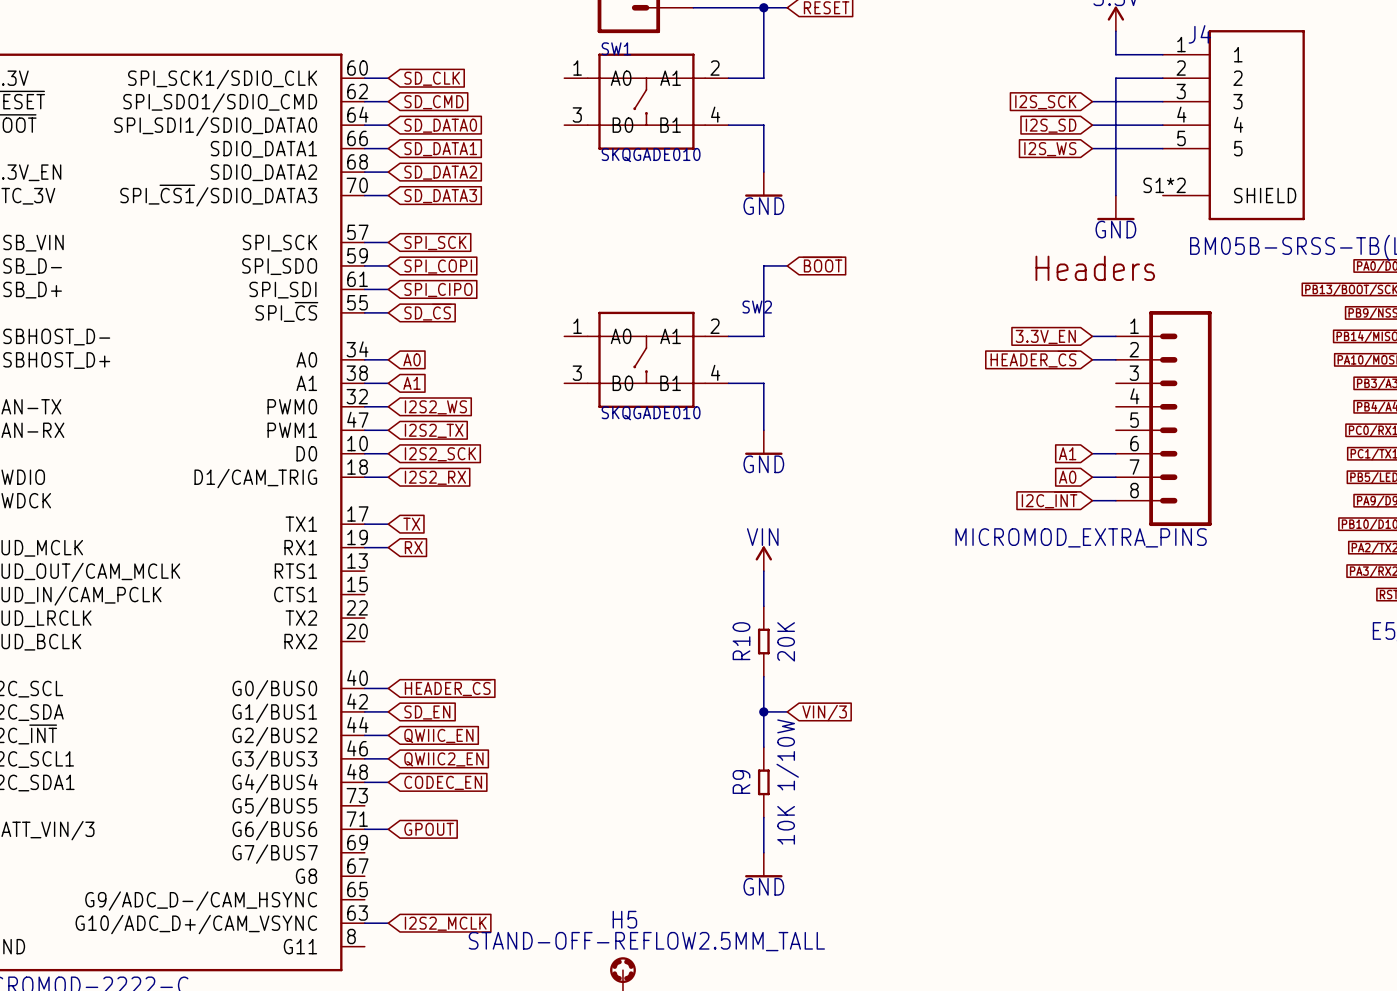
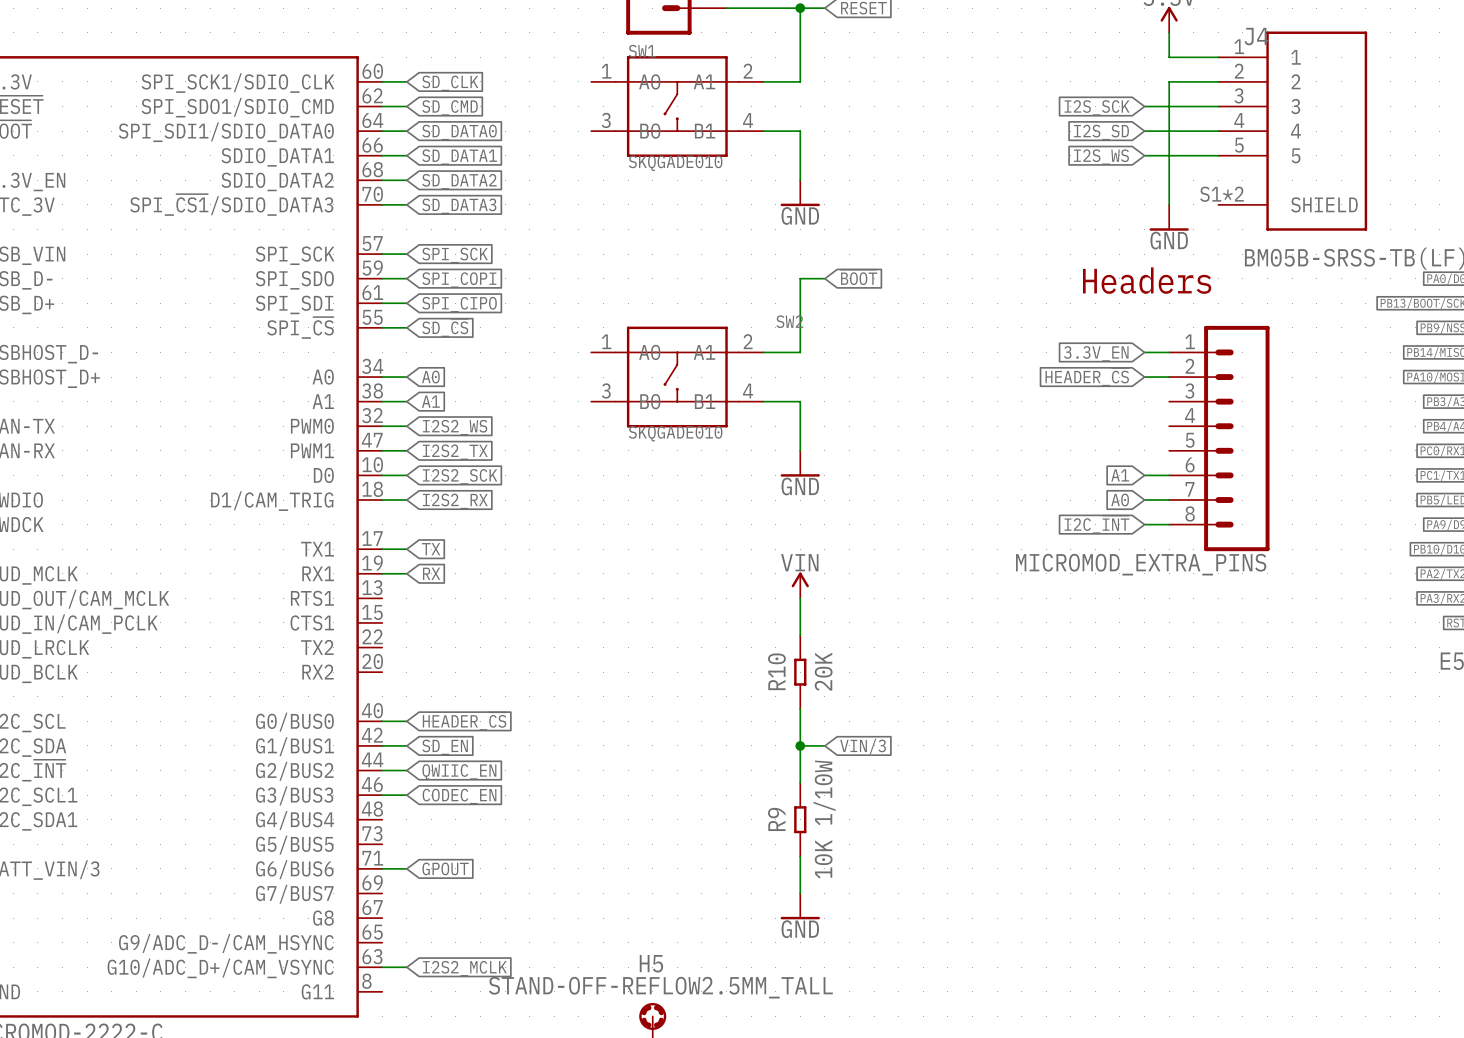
global label: QWIIC2_EN (443, 759) -> CODEC_EN (459, 796)
wire: (364, 782) (388, 782) -> none
global label: CODEC_EN (443, 782) -> none

